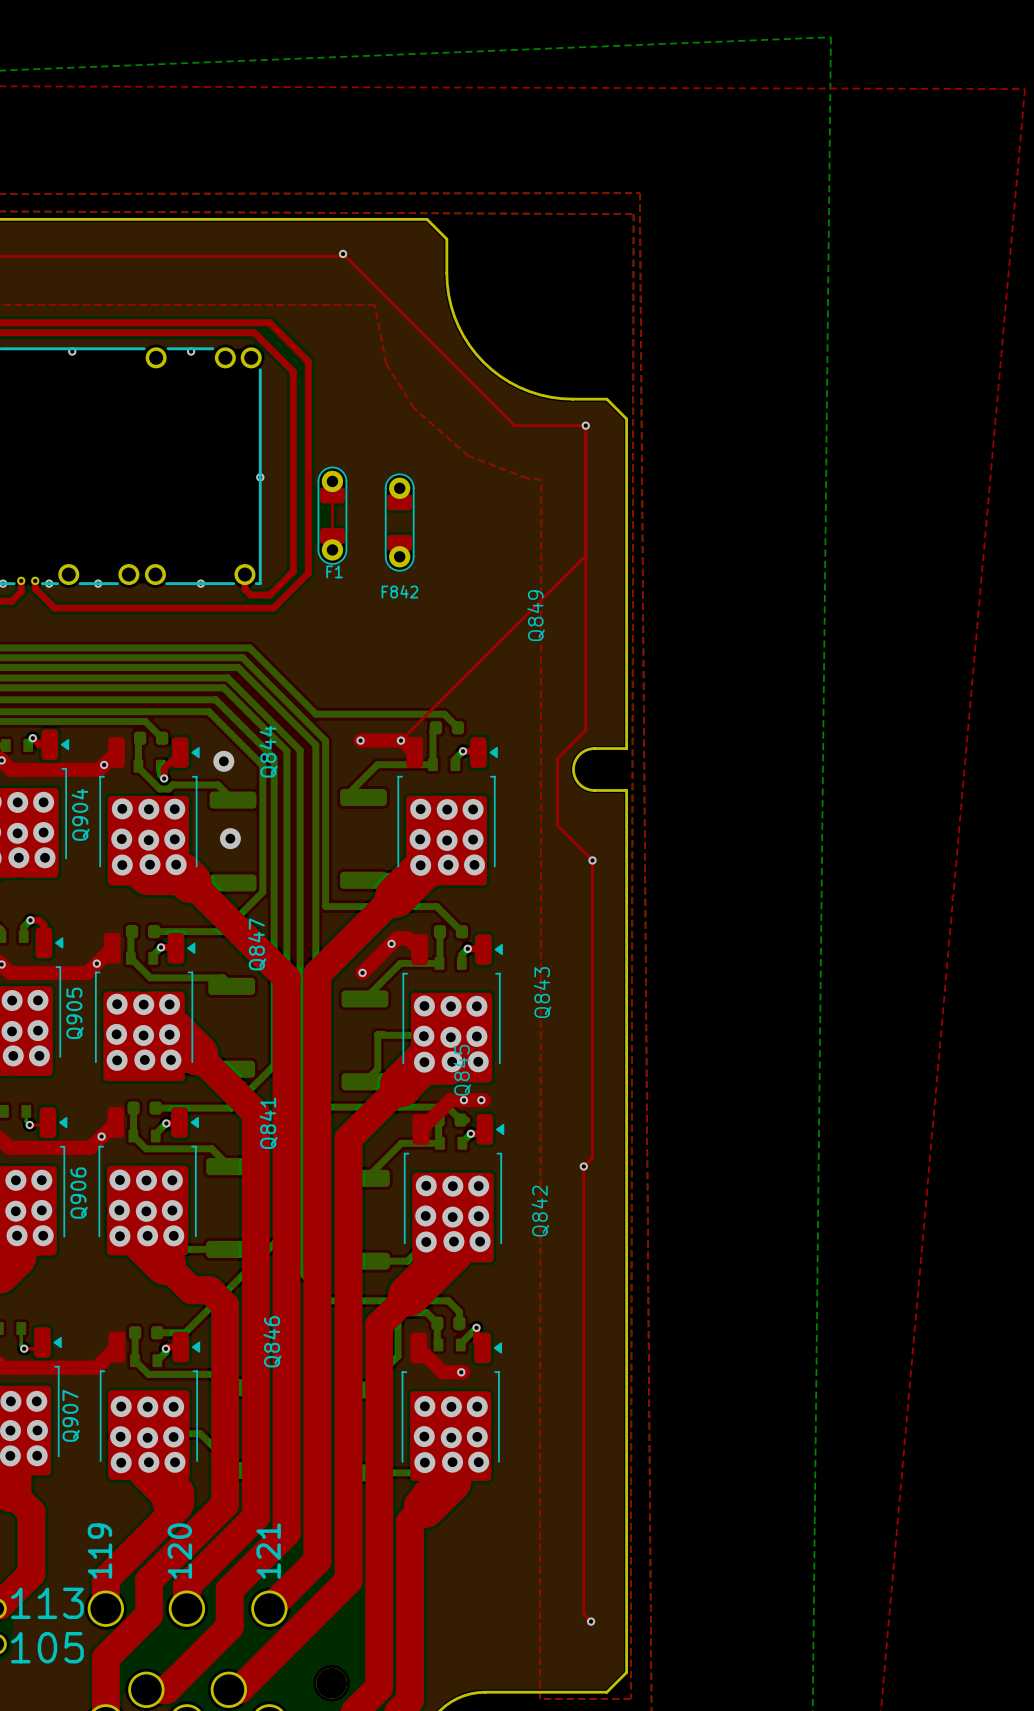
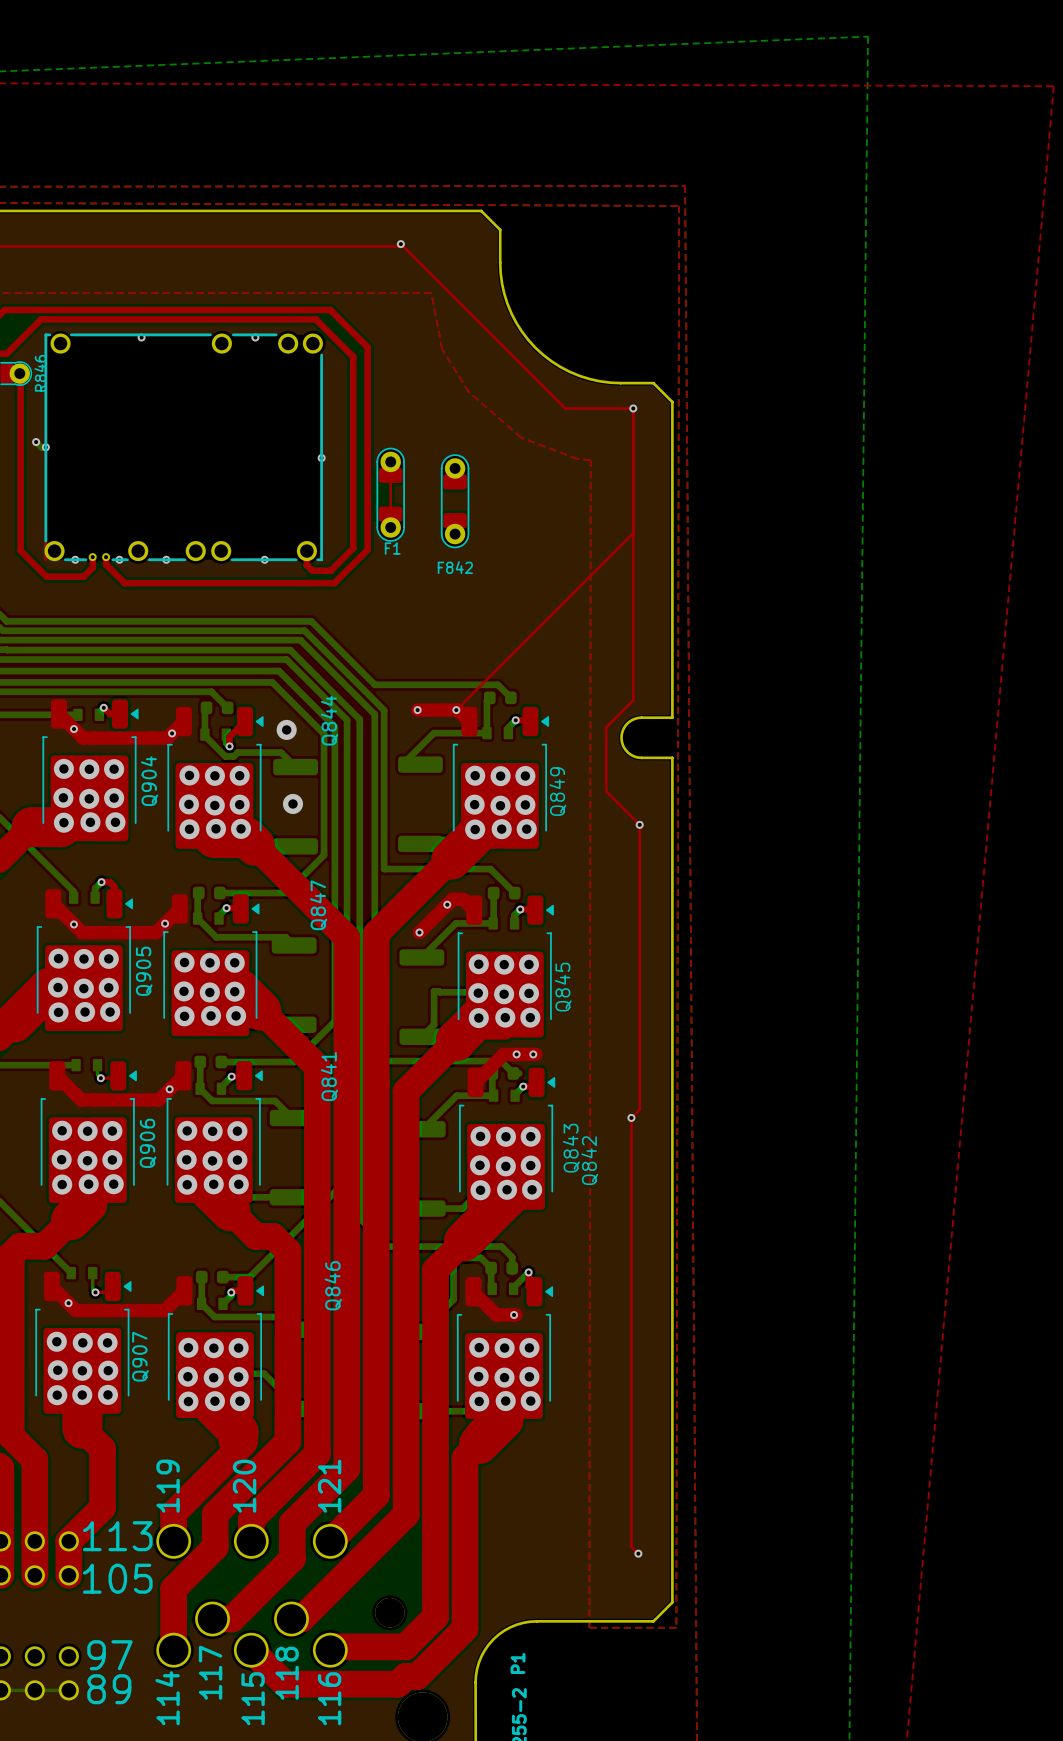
Q849 name position: Q849 (536, 615) -> Q849 (557, 791)
Q843 name position: Q843 (542, 992) -> Q843 (571, 1148)
Q845 name position: Q845 (462, 1070) -> Q845 (563, 987)

